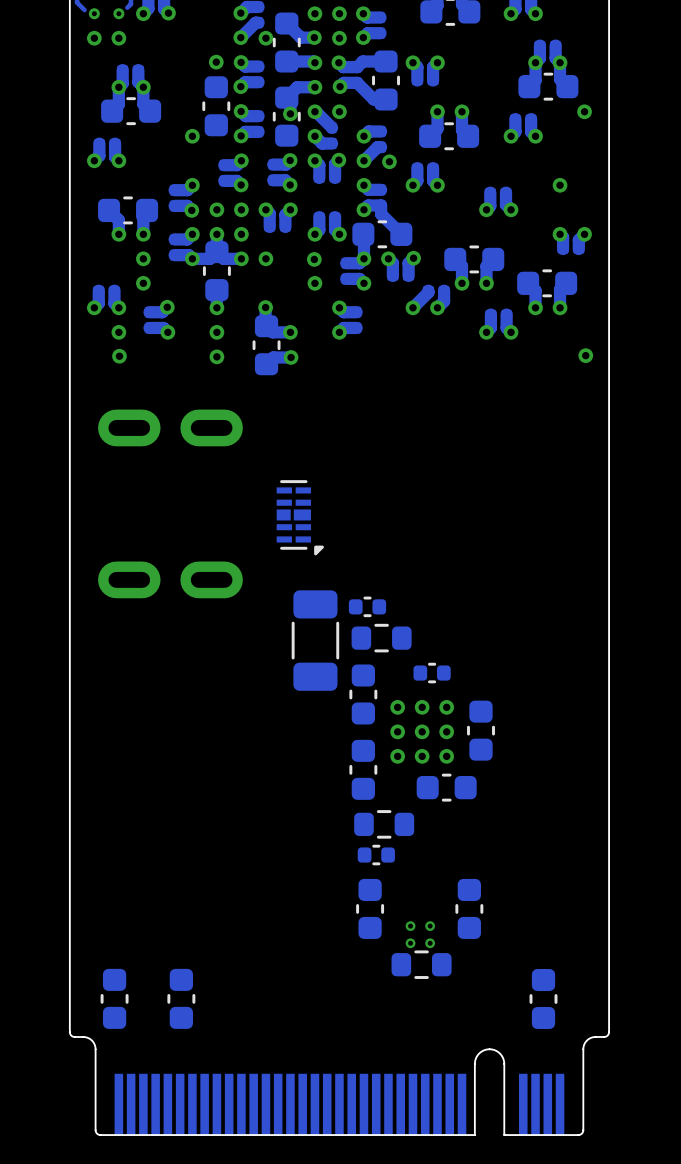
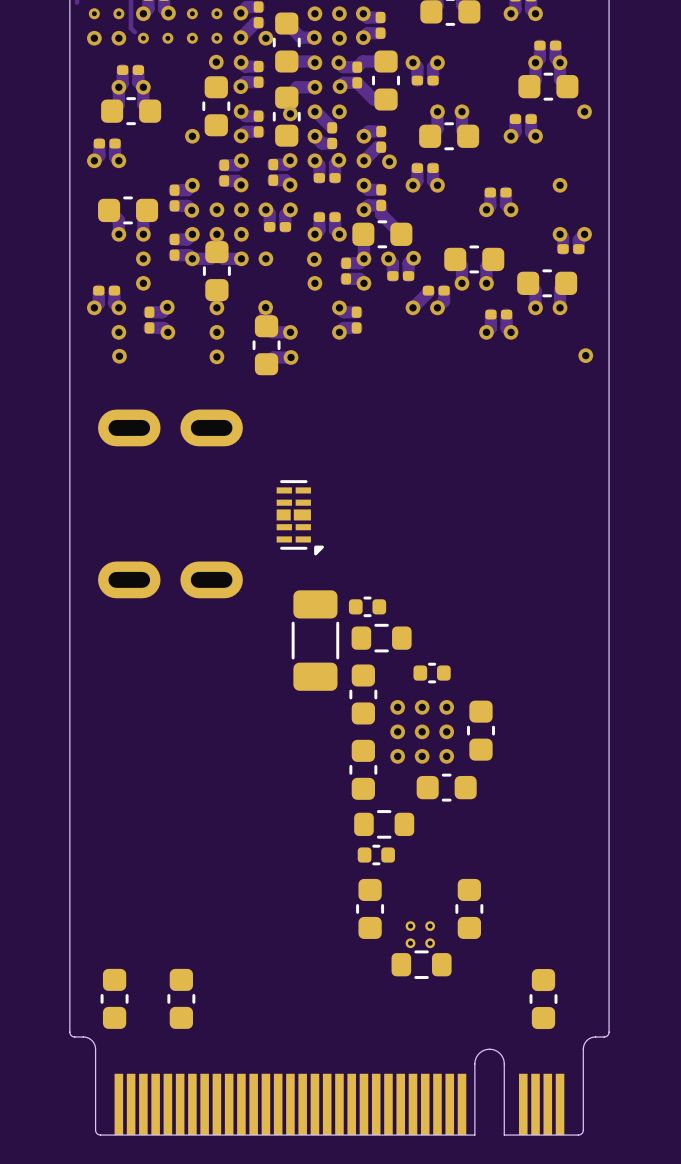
track: (77, 2) (84, 10) -> none
track: (130, 4) (127, 7) -> (130, 4) (130, 28) (134, 32)
via: none -> (192, 13)
via: none -> (216, 13)
via: none -> (143, 38)
via: none -> (167, 38)
via: none -> (192, 38)
via: none -> (216, 38)

